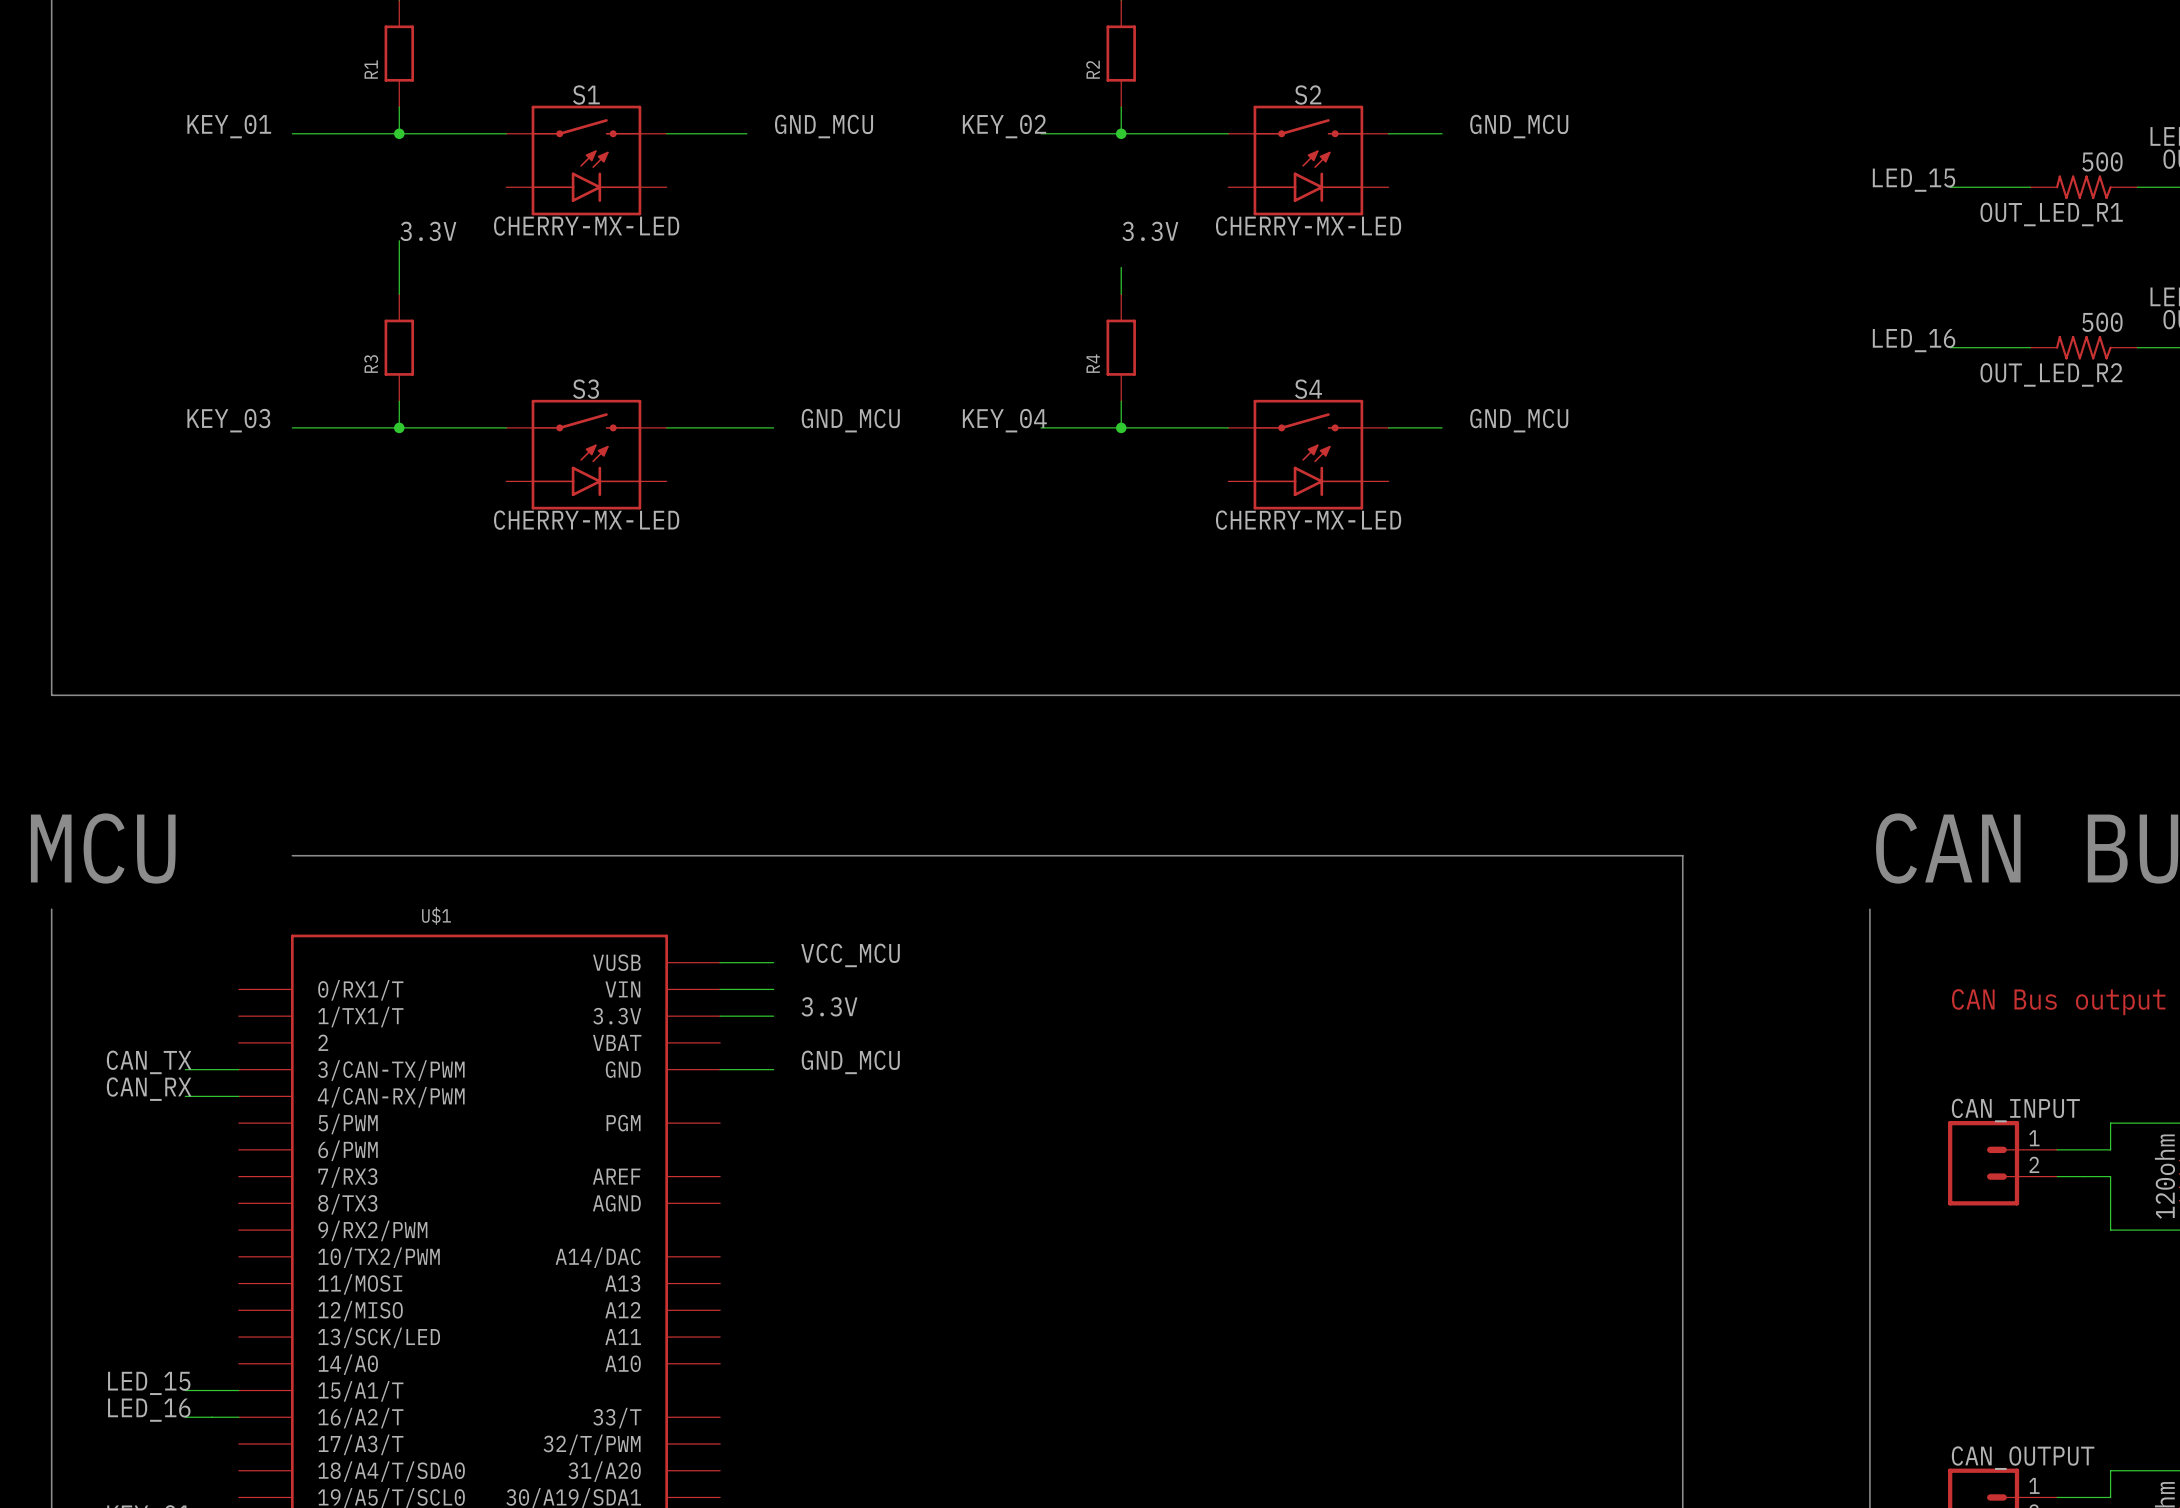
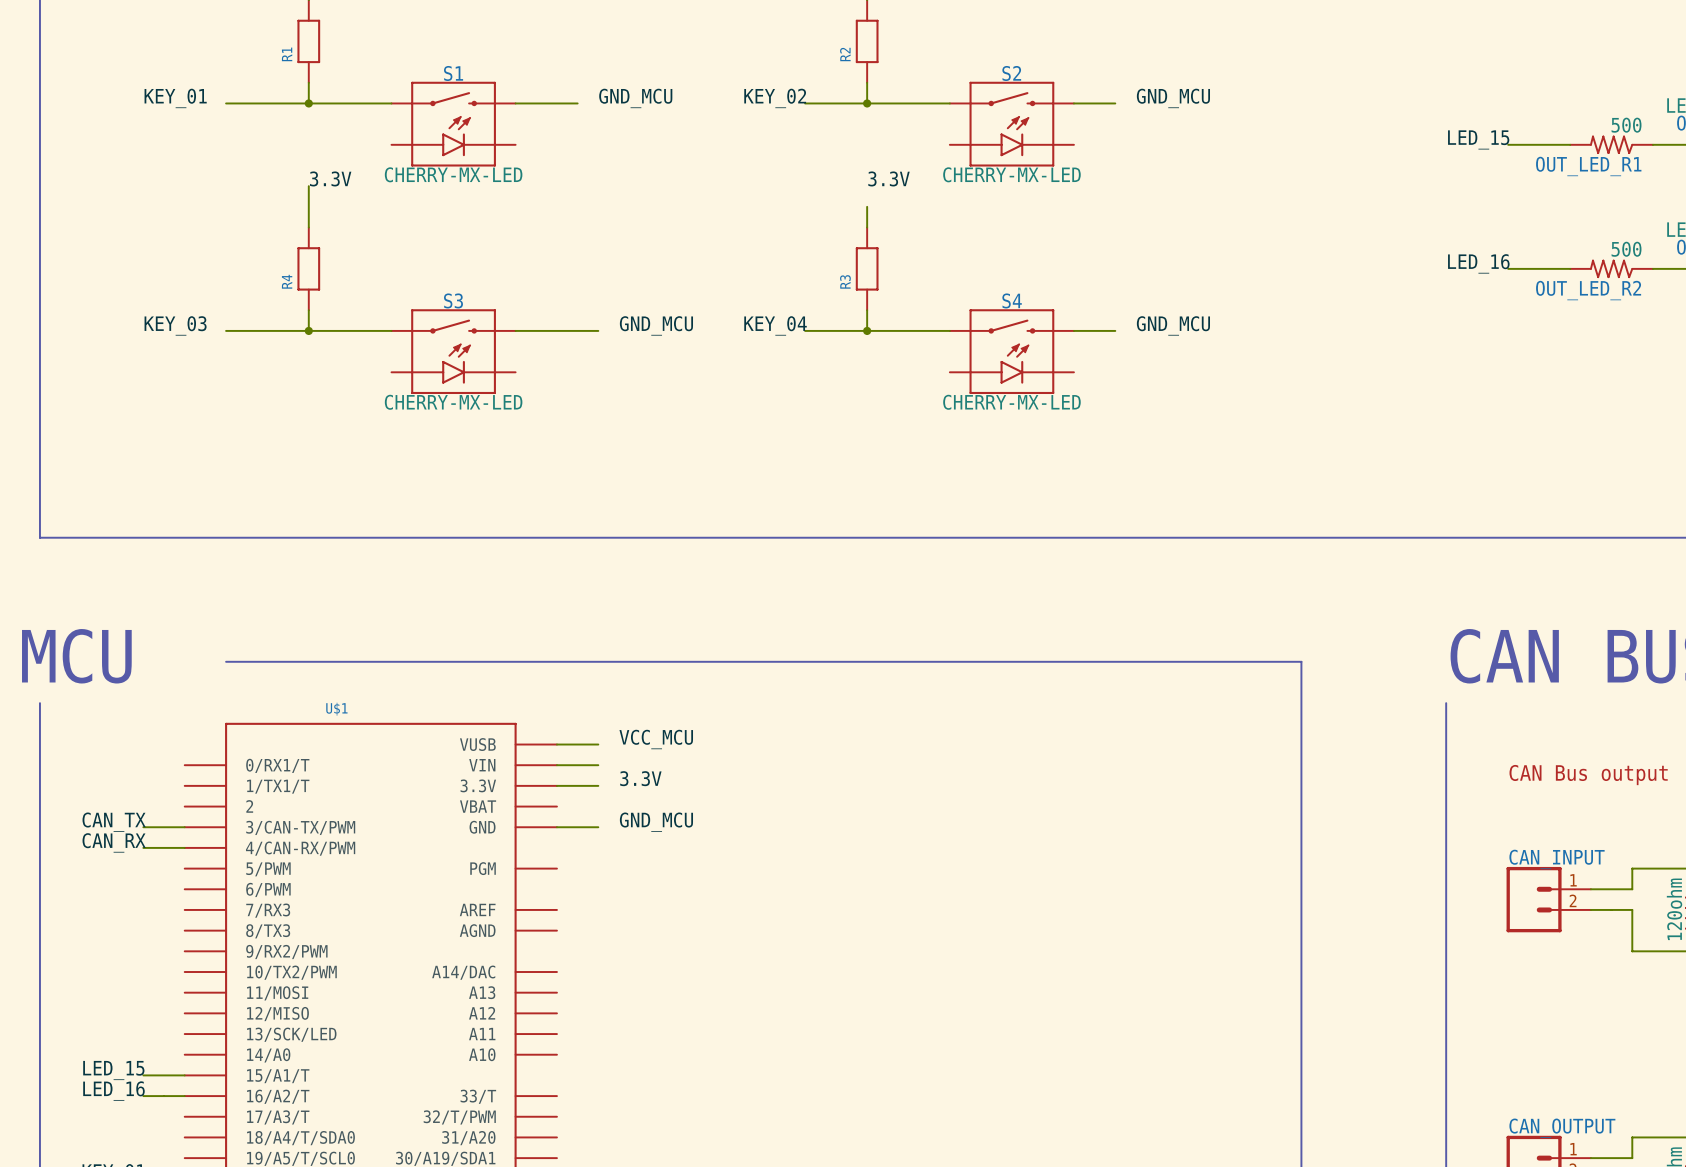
R4 name: R4 (1093, 363) -> R3 (845, 281)
R3 name: R3 (371, 364) -> R4 (287, 281)

